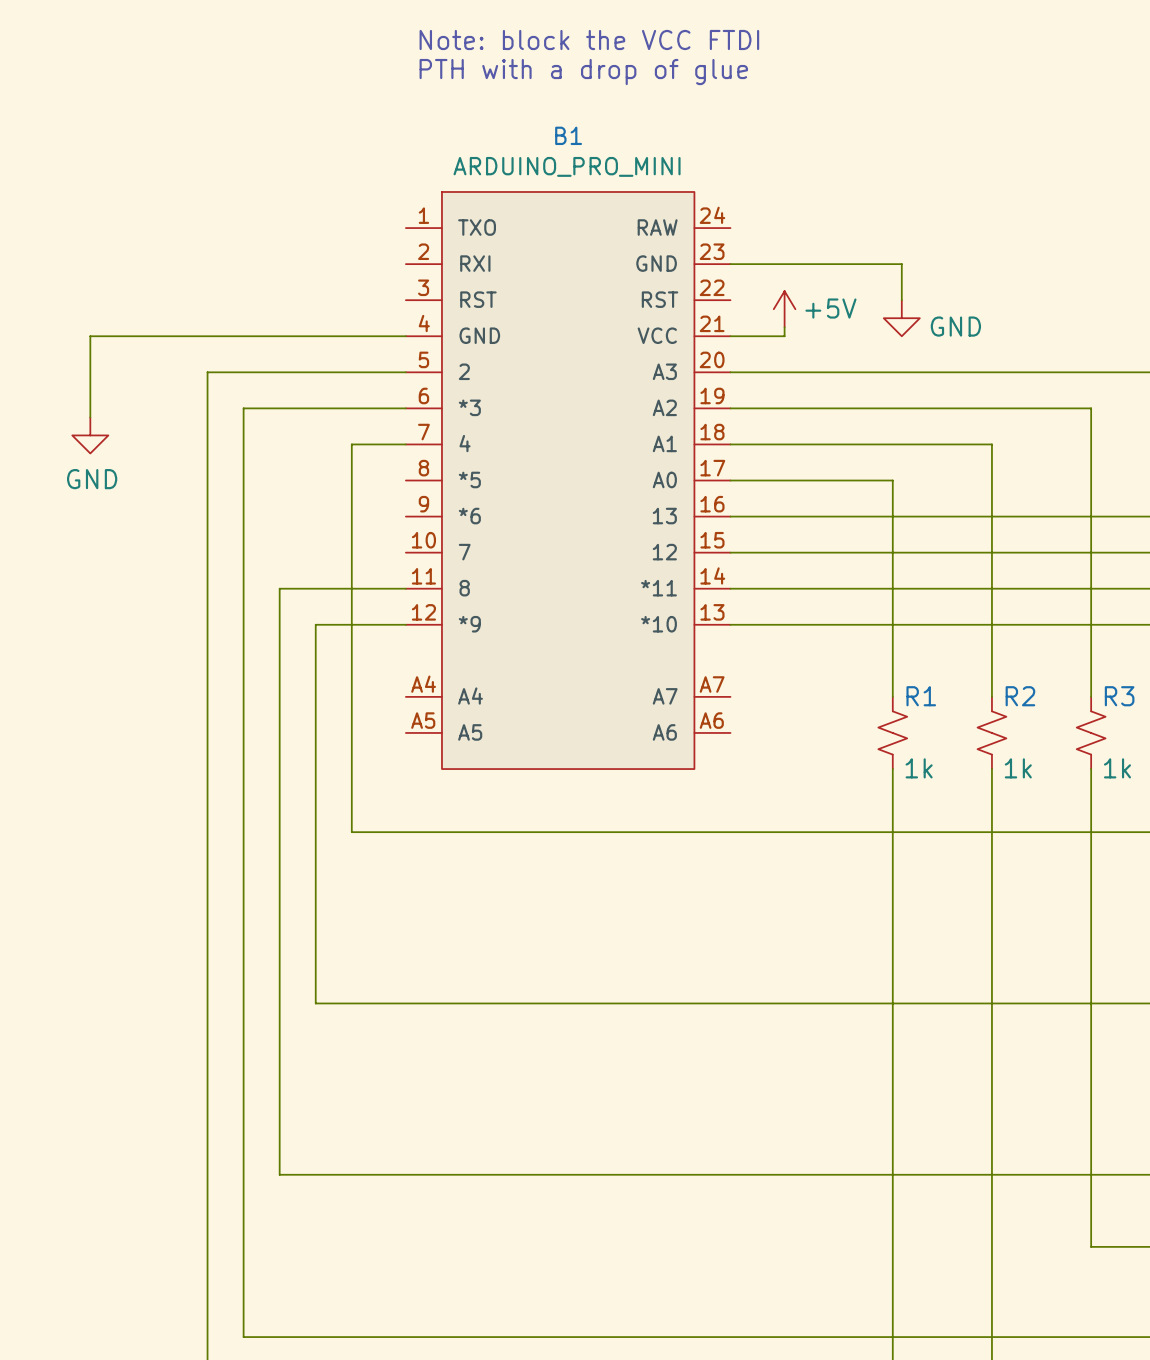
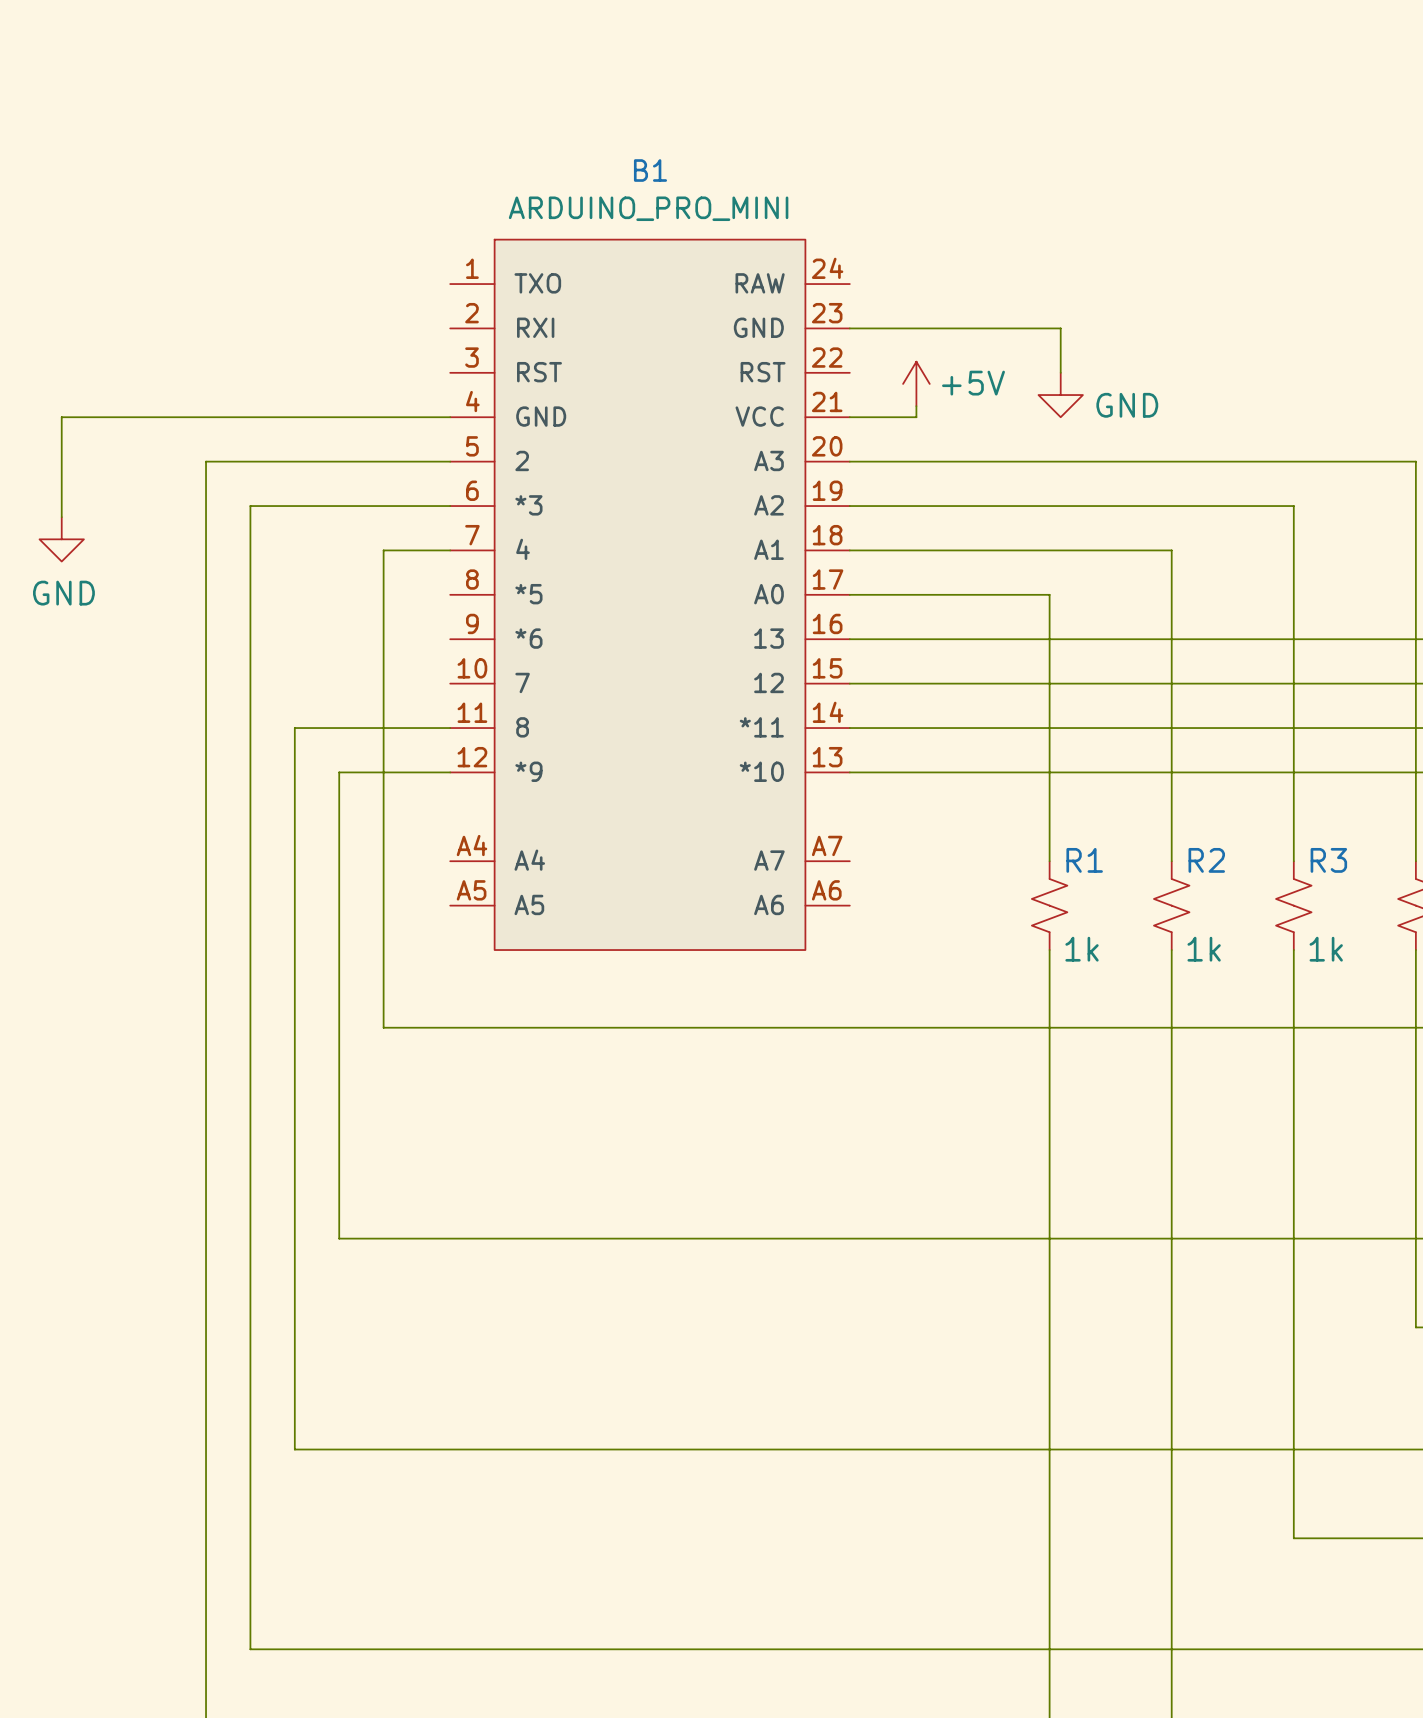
text: Note: block the VCC FTDI (589, 39) -> none
text: PTH with a drop of glue (583, 72) -> none

